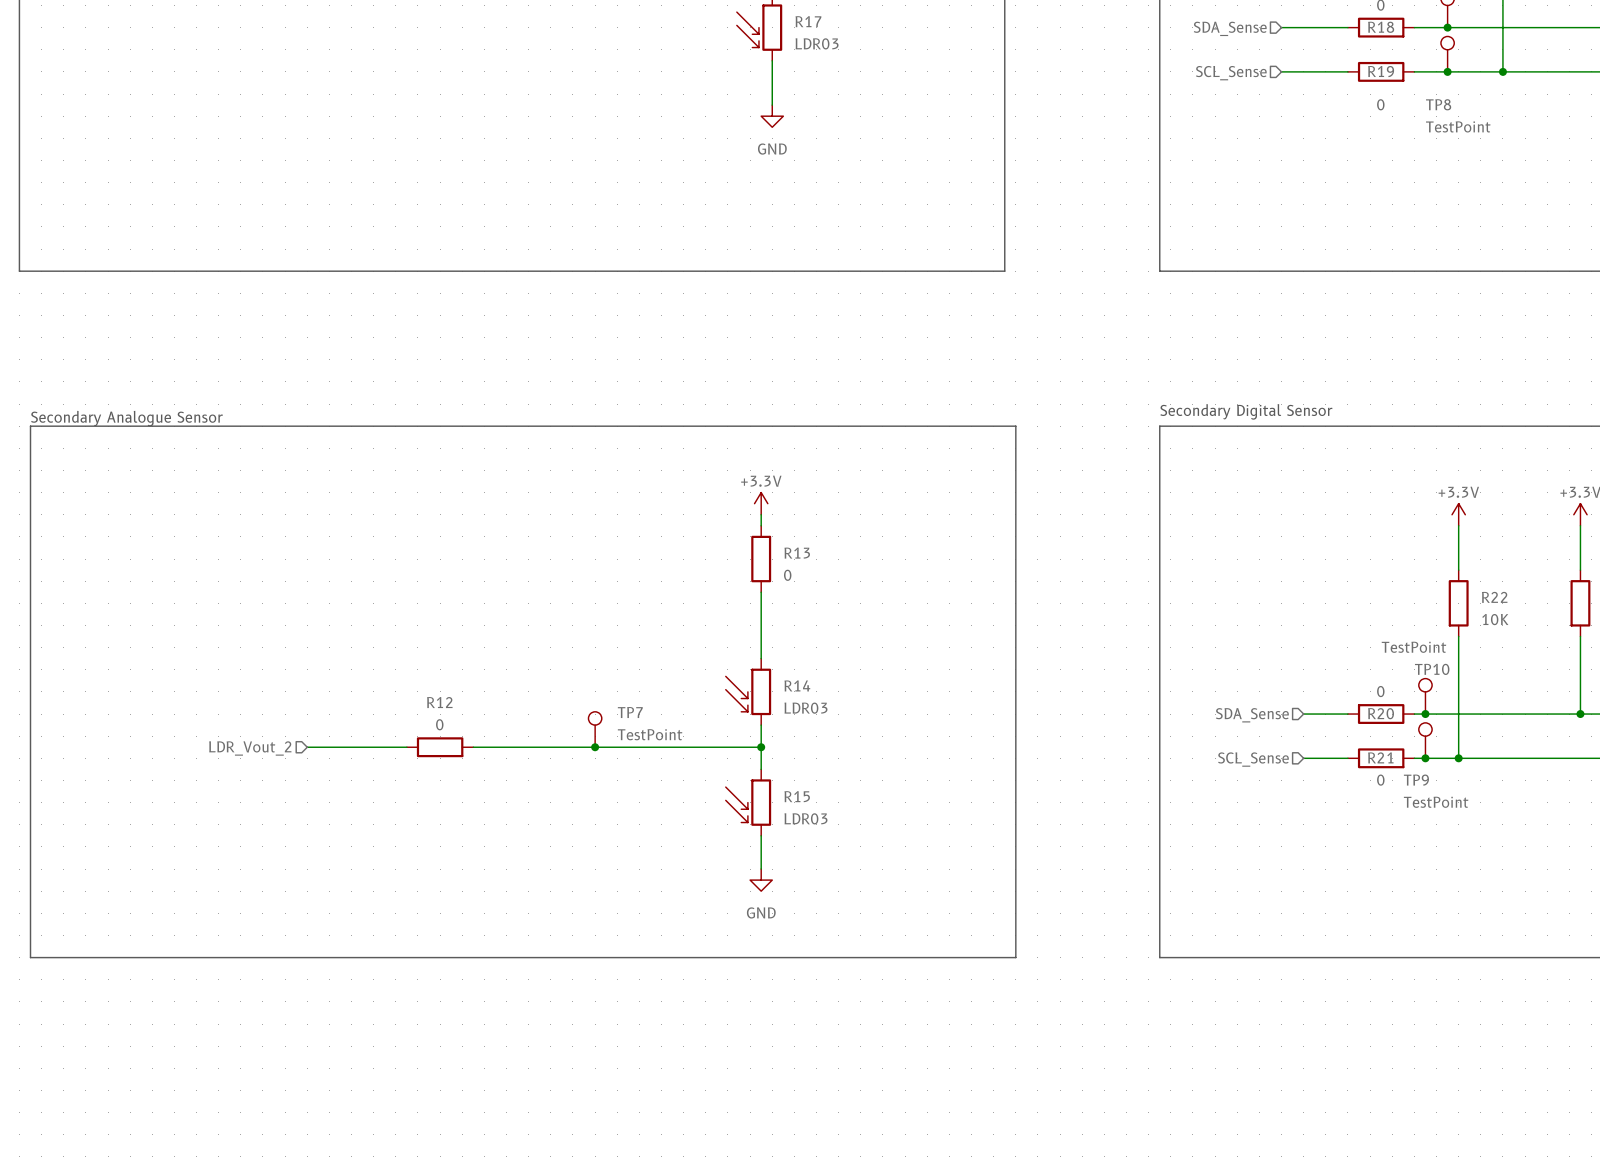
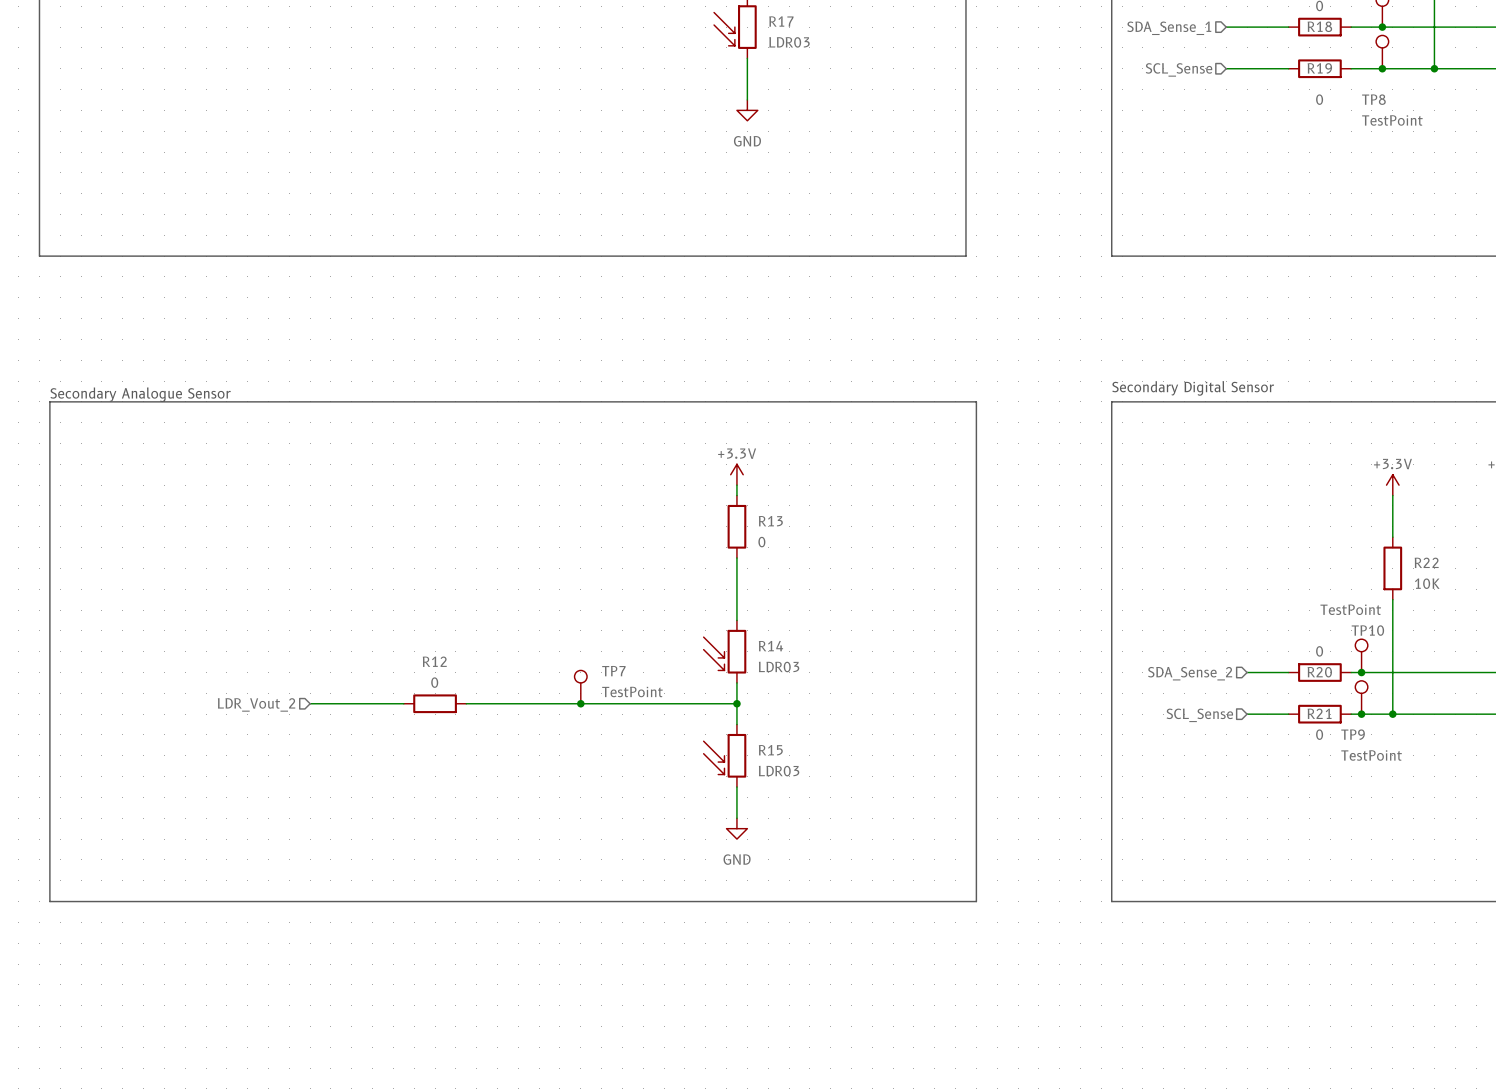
hierarchical label: SDA_Sense (1230, 28) -> SDA_Sense_1 (1169, 28)
hierarchical label: SDA_Sense (1252, 715) -> SDA_Sense_2 (1190, 673)

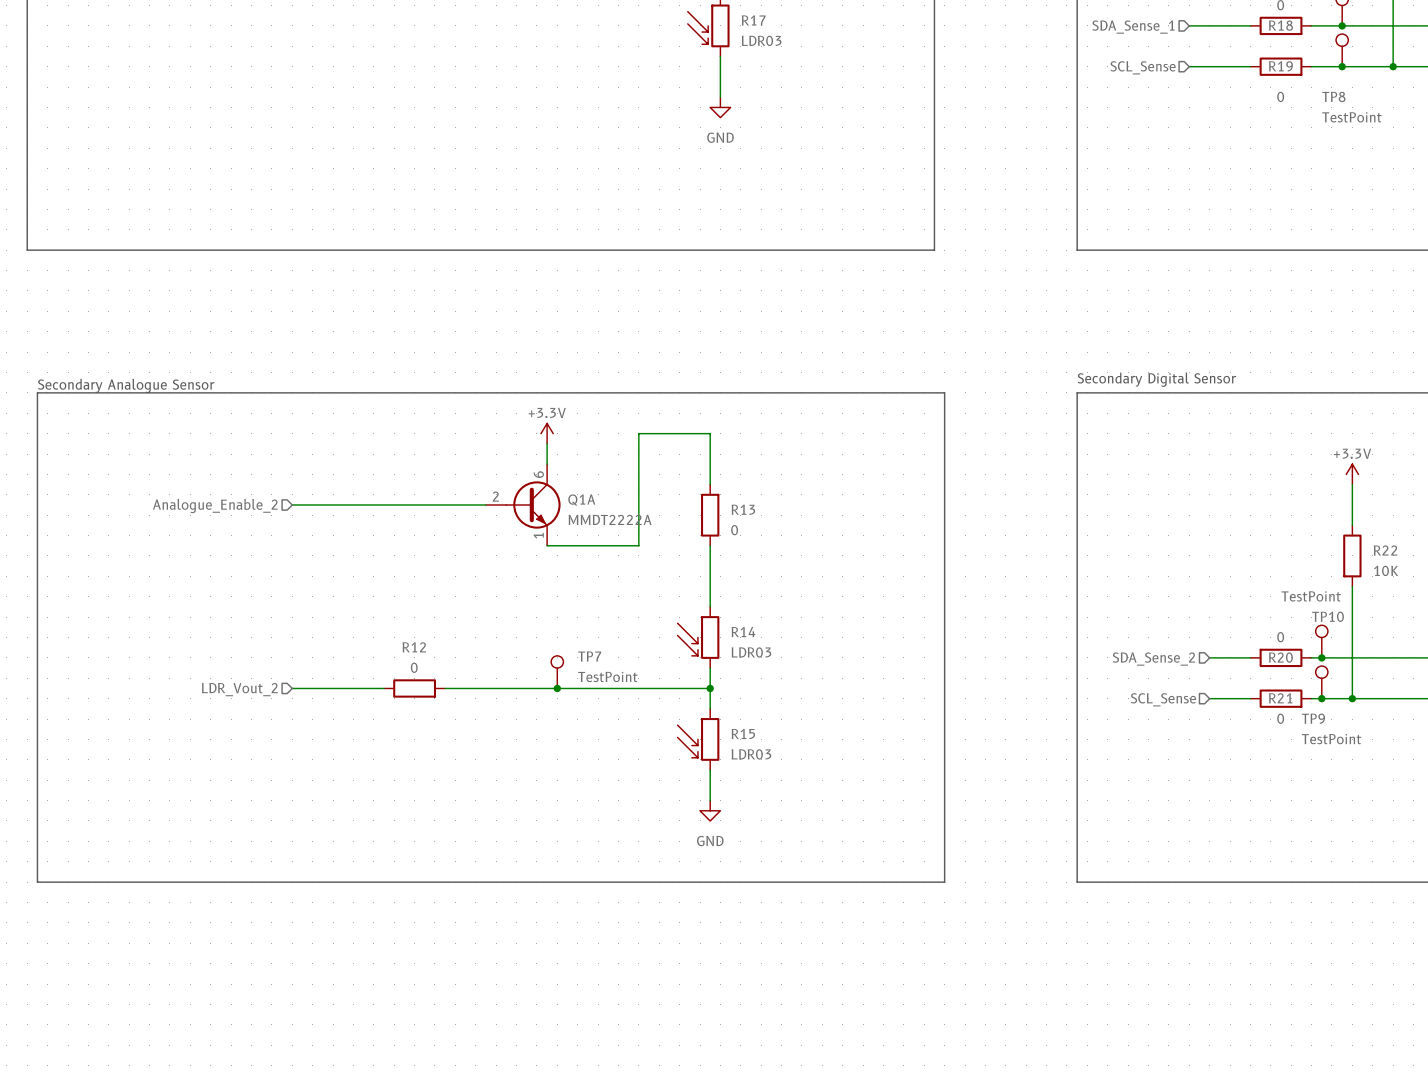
wire: none -> (547, 443) (547, 464)
power symbol position: +3.3V (736, 474) -> +3.3V (547, 433)
wire: none -> (710, 474) (710, 433) (638, 433) (638, 545) (547, 545)
wire: none -> (292, 504) (485, 504)
Q1A: none -> MMDT2222A (523, 504)
hierarchical label: none -> Analogue_Enable_2 (215, 506)

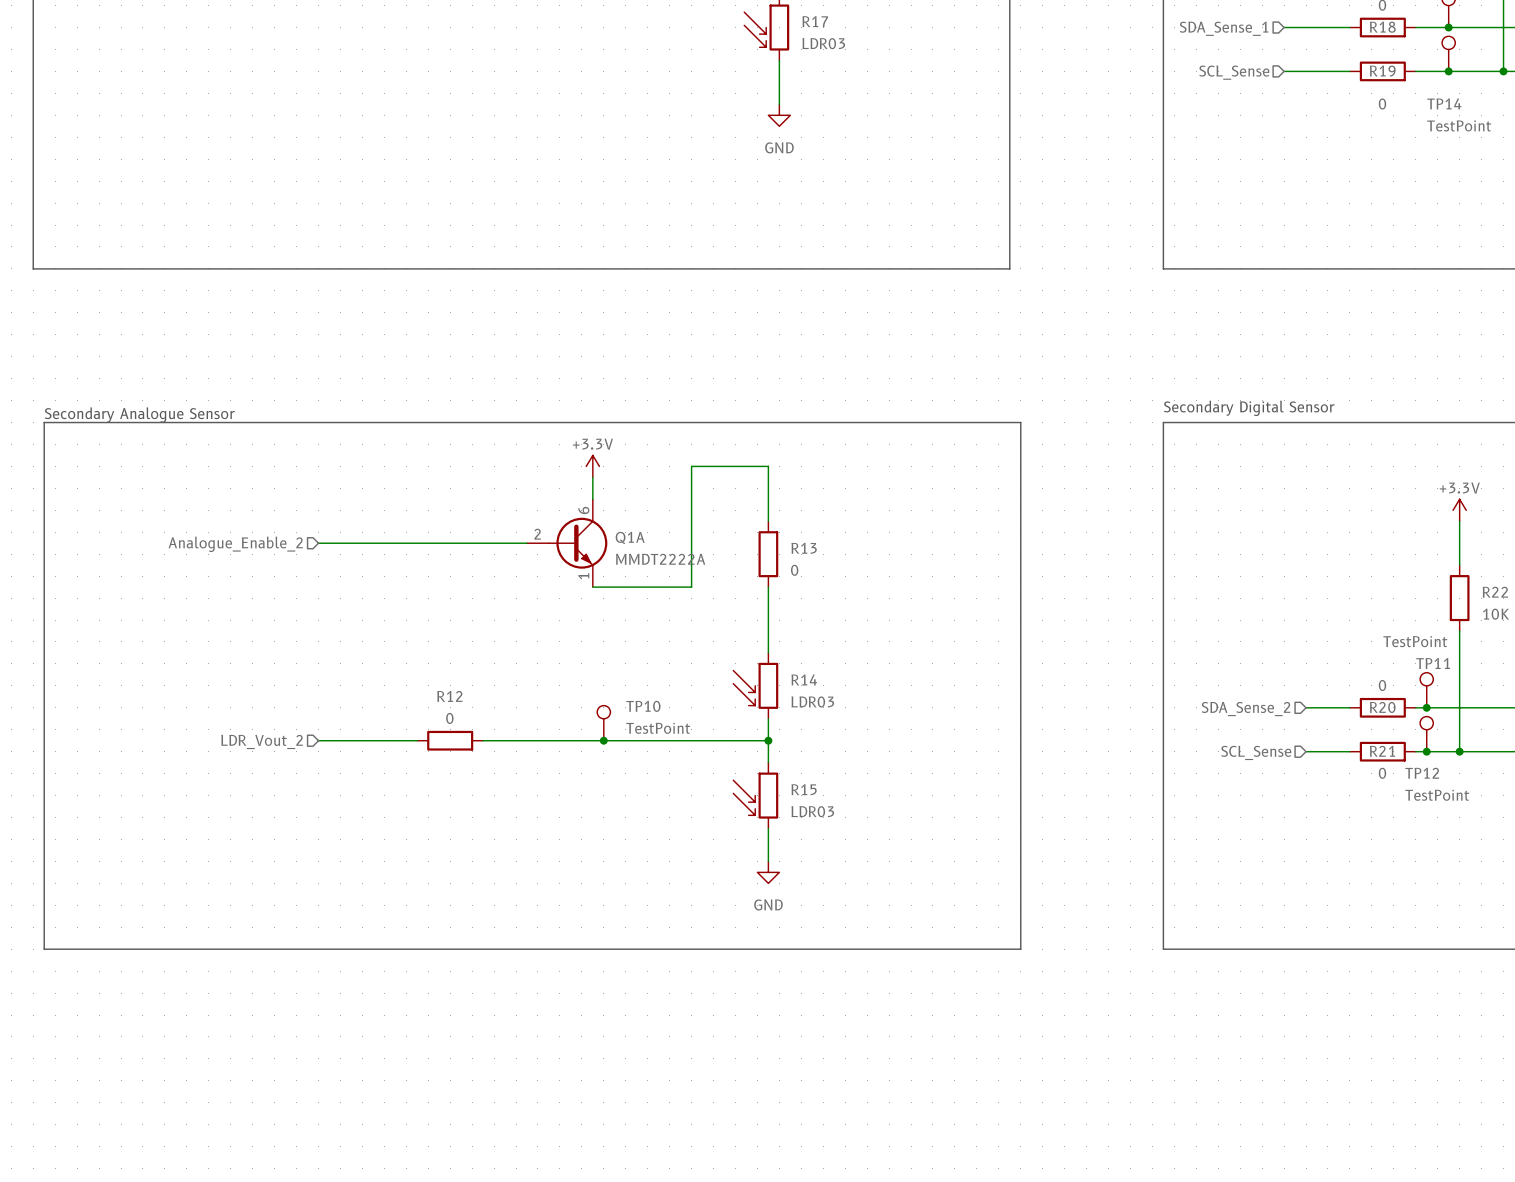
TP8 name: TP8 (1333, 96) -> TP14 (1444, 103)
TP10 name: TP10 (1327, 616) -> TP11 (1433, 663)
TP7 name: TP7 (589, 656) -> TP10 (643, 706)
TP9 name: TP9 (1313, 718) -> TP12 (1422, 773)

